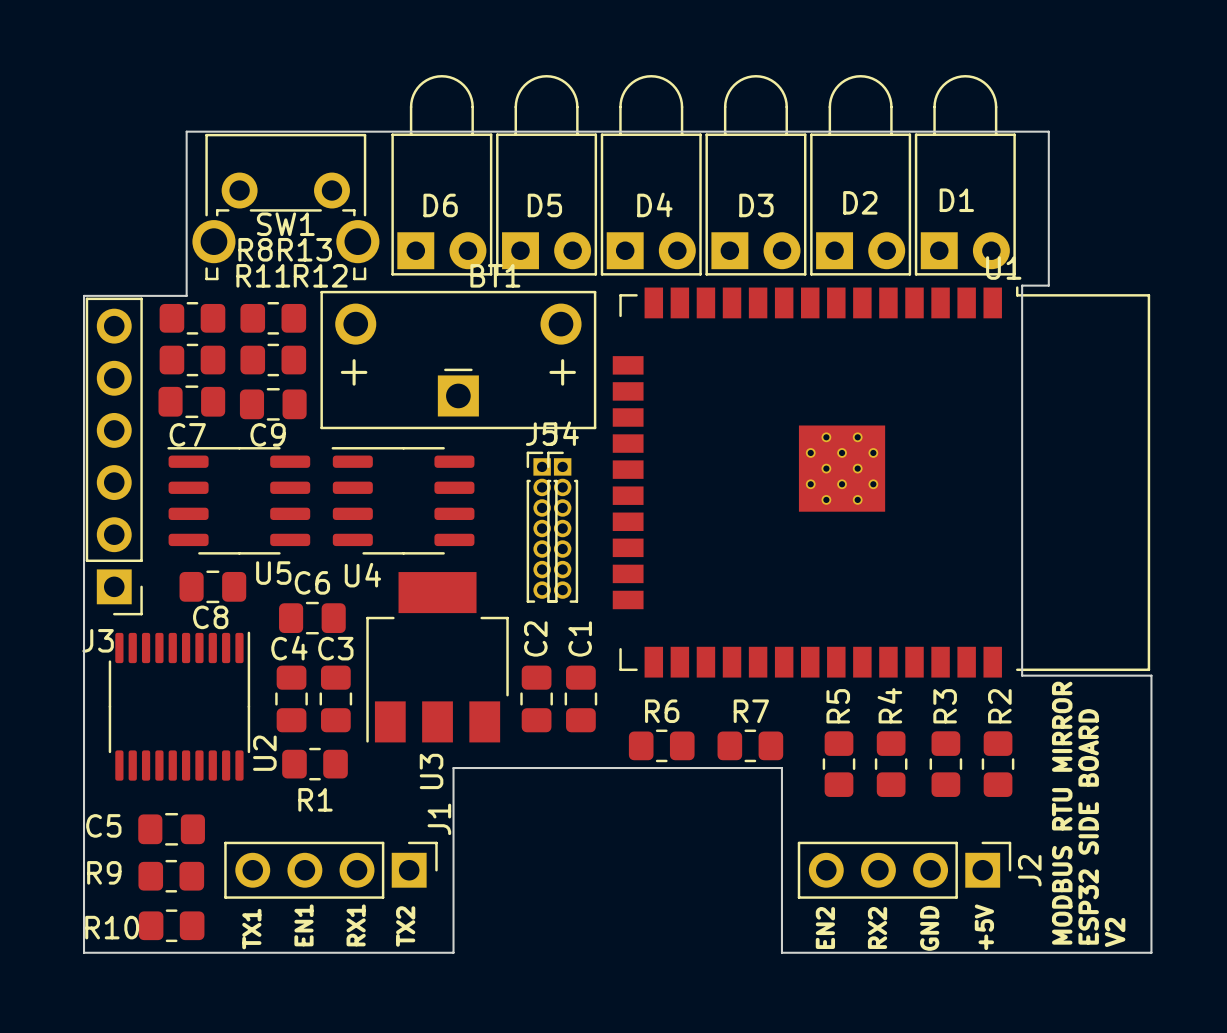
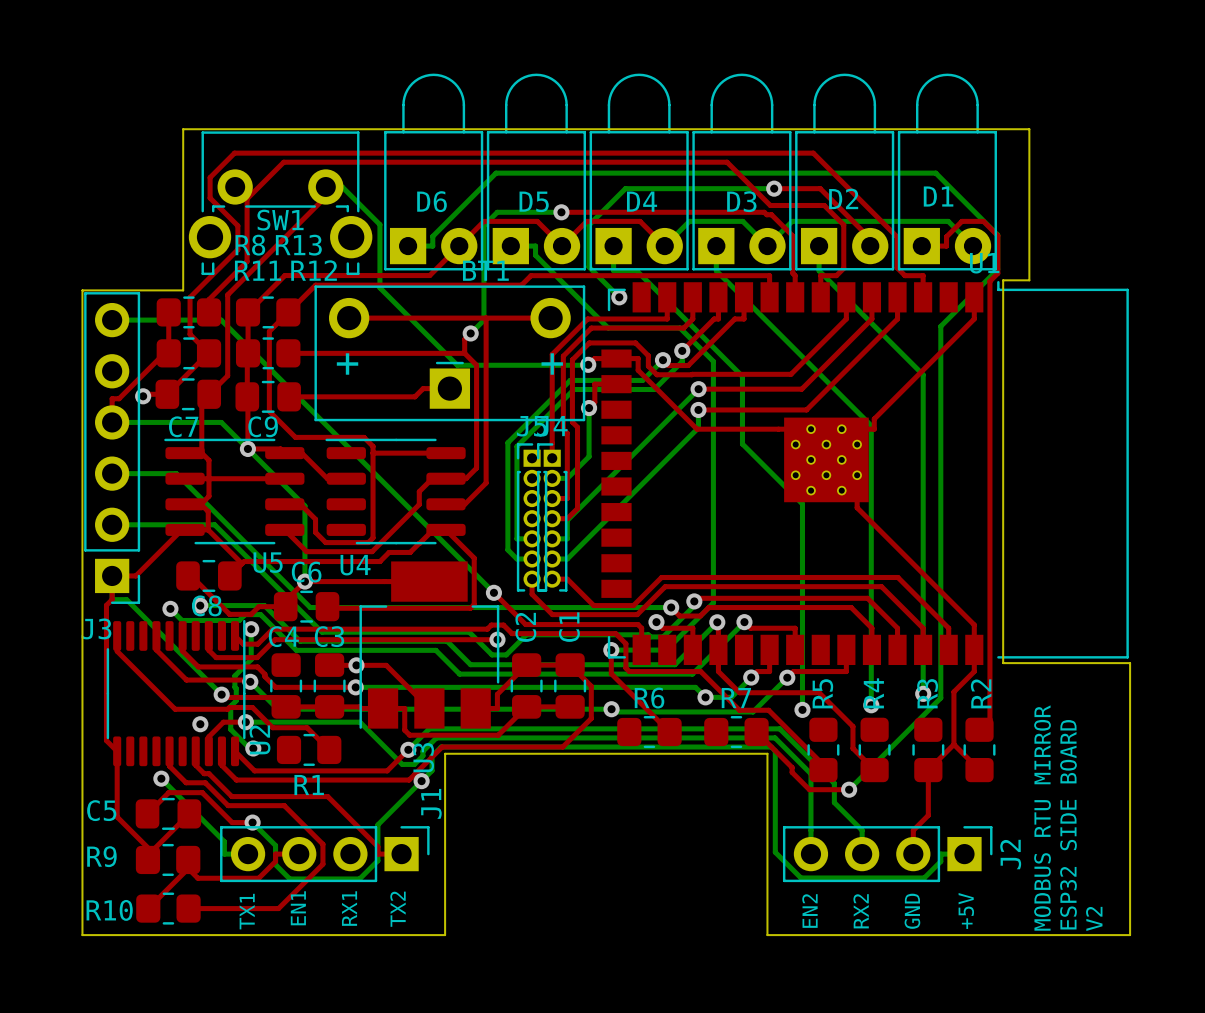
top track: none -> (325, 186) (325, 196) (227, 294) (227, 375) (201, 401) (201, 453)
bottom track: none -> (325, 186) (342, 186) (379, 224) (379, 287) (457, 365) (588, 364)
top track: none -> (774, 188) (820, 188) (870, 238) (870, 246)
bottom track: none -> (774, 188) (625, 188) (588, 225) (588, 266) (619, 297)
via: none -> (774, 188)
top track: none -> (247, 198) (247, 261) (209, 299) (209, 312)
top track: none -> (247, 198) (283, 162) (727, 162) (770, 205) (824, 205) (843, 224) (843, 268) (836, 275) (820, 275) (820, 297)
top track: none -> (561, 212) (764, 212) (766, 214) (771, 214) (792, 236) (795, 297)
bottom track: none -> (561, 212) (497, 212) (483, 225) (483, 320) (470, 333)
via: none -> (561, 212)
bottom track: none -> (408, 246) (432, 246) (432, 236) (496, 173) (935, 173) (997, 235) (997, 269) (940, 326) (940, 698) (849, 789)
bottom track: none -> (510, 246) (535, 246) (535, 255) (608, 328) (680, 328) (713, 361) (713, 602) (666, 650) (611, 650)
bottom track: none -> (613, 246) (613, 270) (636, 270) (742, 376) (742, 444) (802, 504) (802, 709)
top track: none -> (664, 246) (640, 221) (586, 221) (562, 246) (537, 221) (483, 221) (429, 275) (284, 275) (248, 312) (247, 448) (280, 448) (284, 453) (301, 453) (327, 478) (346, 478)
bottom track: none -> (664, 246) (689, 221) (742, 221) (767, 246) (792, 221) (948, 221) (973, 246)
bottom track: none -> (716, 246) (716, 270) (871, 425) (871, 705)
bottom track: none -> (819, 246) (819, 270) (923, 374) (923, 693)
top track: none -> (921, 246) (946, 246) (946, 236) (961, 221) (983, 221) (997, 235) (997, 273) (989, 281) (989, 719) (979, 729)
via: none -> (619, 297)
top track: none -> (667, 297) (667, 318) (587, 318) (552, 354) (552, 458)
top track: none -> (692, 297) (692, 318) (683, 328) (591, 328) (563, 356) (563, 429) (567, 433) (567, 498) (552, 498)
top track: none -> (718, 297) (718, 318) (714, 318) (682, 350)
top track: none -> (744, 297) (744, 318) (734, 318) (688, 365) (668, 365) (662, 360)
top track: none -> (769, 297) (769, 275) (531, 275) (521, 285) (315, 285) (269, 331) (269, 411) (295, 437) (364, 437) (373, 446) (373, 537) (368, 542) (325, 542) (315, 532) (315, 519) (300, 504) (284, 504)
top track: none -> (846, 297) (846, 318) (791, 374) (656, 374) (648, 366) (648, 355) (635, 342) (589, 342) (572, 359) (572, 422) (577, 427) (577, 508) (567, 518) (552, 518)
top track: none -> (871, 297) (871, 318) (801, 389) (698, 389)
top track: none -> (897, 297) (897, 318) (806, 409) (698, 409)
top track: none -> (923, 297) (923, 275) (905, 275) (897, 267) (897, 236) (813, 153) (234, 153) (210, 177) (210, 198) (237, 225) (237, 249) (190, 297) (190, 334) (209, 353) (167, 394) (145, 394) (143, 396)
top track: none -> (974, 297) (974, 318) (874, 419) (874, 429) (697, 429) (638, 370) (638, 358) (594, 358) (588, 364)
top track: none -> (168, 312) (168, 353) (164, 353) (119, 398) (112, 398) (112, 422)
top track: none -> (349, 318) (550, 318)
top track: none -> (486, 318) (486, 483) (464, 504) (446, 504)
bottom track: none -> (112, 320) (221, 320) (493, 592)
top track: none -> (470, 333) (464, 339) (464, 353)
via: none -> (470, 333)
bottom track: none -> (682, 350) (682, 361) (654, 389) (573, 389) (516, 446) (516, 538) (532, 538)
via: none -> (682, 350)
top track: none -> (288, 353) (464, 353)
top track: none -> (464, 353) (476, 365) (476, 468) (465, 478) (432, 478) (419, 491) (419, 504) (372, 551) (306, 551) (284, 529)
bottom track: none -> (662, 360) (642, 380) (570, 380) (507, 442) (507, 549) (516, 558) (532, 558)
via: none -> (662, 360)
via: none -> (588, 364)
top track: none -> (616, 384) (594, 384) (594, 402) (589, 408)
top track: none -> (449, 388) (423, 388) (414, 396) (289, 396)
bottom track: none -> (698, 389) (567, 520) (567, 538) (552, 538)
via: none -> (698, 389)
via: none -> (143, 396)
bottom track: none -> (589, 408) (589, 456) (567, 478) (552, 478)
via: none -> (589, 408)
bottom track: none -> (698, 409) (698, 427) (567, 558) (552, 558)
via: none -> (698, 409)
bottom track: none -> (112, 422) (221, 422) (304, 505) (304, 581)
top track: none -> (795, 429) (795, 490) (857, 490) (857, 507) (974, 624) (974, 671) (953, 691) (953, 744)
via: none -> (247, 448)
top track: none -> (201, 453) (208, 460) (208, 496) (200, 504)
top track: none -> (373, 453) (446, 453)
bottom track: none -> (112, 473) (176, 473) (310, 607) (671, 607)
top track: none -> (185, 478) (284, 478)
top track: none -> (200, 504) (208, 511) (208, 529)
bottom track: none -> (112, 524) (214, 524) (322, 632) (469, 632) (492, 654) (506, 654) (526, 634) (648, 634) (650, 636) (663, 636) (694, 605) (694, 601)
top track: none -> (208, 529) (181, 529) (135, 575) (112, 575) (112, 599) (106, 605) (106, 740) (117, 751) (117, 817) (151, 851)
top track: none -> (208, 529) (242, 563)
bottom track: none -> (112, 575) (112, 599) (126, 599) (221, 694)
top track: none -> (188, 575) (191, 575) (229, 614) (251, 614) (258, 606) (285, 606) (285, 600) (304, 581) (429, 581)
top track: none -> (229, 575) (244, 561) (380, 561) (389, 552) (410, 552) (429, 533) (442, 533) (446, 529) (474, 558) (474, 604) (470, 608) (329, 608) (327, 606)
top track: none -> (532, 579) (532, 594) (552, 614) (637, 614) (665, 586) (881, 586) (923, 628) (923, 649)
top track: none -> (552, 579) (567, 579) (593, 605) (633, 605) (661, 577) (897, 577) (948, 628) (948, 649)
via: none -> (304, 581)
top track: none -> (493, 592) (525, 624) (637, 624) (641, 628) (641, 649)
via: none -> (493, 592)
top track: none -> (694, 601) (697, 598) (867, 598) (897, 628) (897, 649)
via: none -> (694, 601)
bottom track: none -> (200, 605) (264, 605) (300, 641) (447, 641) (470, 664) (674, 664) (717, 622)
via: none -> (200, 605)
top track: none -> (671, 607) (679, 616) (700, 616) (708, 607) (851, 607) (871, 628) (871, 649)
via: none -> (671, 607)
bottom track: none -> (170, 608) (182, 620) (239, 620) (245, 614) (260, 614) (296, 650) (435, 650) (459, 674) (692, 674) (744, 622)
via: none -> (170, 608)
top track: none -> (656, 622) (662, 628) (692, 628) (692, 649)
via: none -> (656, 622)
top track: none -> (744, 622) (750, 628) (795, 628) (795, 649)
via: none -> (744, 622)
top track: none -> (717, 622) (718, 671) (739, 692) (819, 692) (852, 726) (852, 748) (874, 770)
via: none -> (717, 622)
bottom track: none -> (251, 629) (251, 659) (234, 675) (236, 700) (230, 706) (230, 729) (249, 748) (253, 748)
via: none -> (251, 629)
top track: none -> (117, 635) (117, 651) (175, 709) (252, 707) (272, 727) (307, 727) (329, 749)
top track: none -> (156, 635) (156, 649) (186, 680) (248, 680) (250, 681)
top track: none -> (182, 635) (182, 651) (198, 666) (257, 666) (275, 687) (355, 687)
top track: none -> (208, 635) (208, 650) (216, 657) (257, 657) (275, 639) (497, 639)
top track: none -> (235, 635) (243, 644) (257, 644) (272, 629) (487, 629) (491, 625) (503, 625) (512, 633) (615, 633) (625, 643) (625, 668) (629, 671) (700, 671) (739, 710) (768, 710) (823, 765) (823, 770)
via: none -> (497, 639)
top track: none -> (611, 650) (611, 673) (669, 732)
via: none -> (611, 650)
top track: none -> (769, 649) (769, 671) (757, 671) (751, 677)
top track: none -> (846, 649) (846, 671) (793, 671) (787, 677)
top track: none -> (329, 665) (386, 665) (429, 708)
via: none -> (356, 665)
bottom track: none -> (751, 677) (731, 697) (705, 697) (695, 687) (355, 687)
via: none -> (751, 677)
bottom track: none -> (787, 677) (753, 711) (614, 711) (611, 709) (277, 709) (250, 681)
via: none -> (787, 677)
via: none -> (250, 681)
via: none -> (355, 687)
via: none -> (923, 693)
top track: none -> (221, 694) (224, 697) (276, 697) (286, 706) (404, 708) (404, 730) (409, 735) (498, 735) (526, 706) (570, 706)
via: none -> (221, 694)
via: none -> (705, 697)
via: none -> (871, 705)
top track: none -> (475, 708) (497, 708) (497, 694) (526, 665) (570, 665) (591, 686) (591, 718) (562, 747) (442, 747) (409, 780) (236, 780) (221, 765) (221, 751)
via: none -> (611, 709)
via: none -> (802, 709)
top track: none -> (245, 722) (223, 722) (208, 736) (208, 751)
bottom track: none -> (245, 722) (360, 722) (402, 764) (414, 764) (422, 755) (422, 751) (436, 737) (775, 737) (810, 773) (810, 854)
via: none -> (245, 722)
via: none -> (200, 724)
top track: none -> (756, 732) (792, 767) (792, 772) (809, 789) (849, 789)
top track: none -> (953, 744) (928, 770) (928, 815) (913, 830) (913, 854)
top track: none -> (953, 744) (979, 770)
via: none -> (253, 748)
top track: none -> (408, 749) (387, 770) (254, 770) (235, 751)
bottom track: none -> (408, 749) (429, 728) (779, 728) (834, 783) (834, 802) (862, 830) (862, 854)
via: none -> (408, 749)
top track: none -> (169, 751) (169, 766) (186, 782) (205, 782) (228, 805) (284, 805) (322, 844) (322, 864) (278, 908) (188, 908)
top track: none -> (195, 751) (195, 765) (204, 773) (209, 773) (231, 796) (327, 796) (377, 846) (377, 854) (401, 854)
bottom track: none -> (161, 778) (224, 841) (224, 854) (248, 854)
via: none -> (161, 778)
via: none -> (421, 781)
via: none -> (849, 789)
top track: none -> (147, 813) (168, 792) (202, 792) (232, 822) (252, 822)
top track: none -> (189, 813) (147, 855) (147, 859)
bottom track: none -> (252, 822) (275, 845) (275, 864) (289, 878) (359, 878) (377, 860) (377, 824) (432, 770) (432, 756) (441, 747) (771, 747) (775, 751) (775, 852) (800, 877) (924, 877) (940, 861) (940, 854) (964, 854)
via: none -> (252, 822)
top track: none -> (299, 854) (275, 854) (275, 861) (258, 878) (197, 878) (188, 868)
top track: none -> (188, 868) (148, 908)

